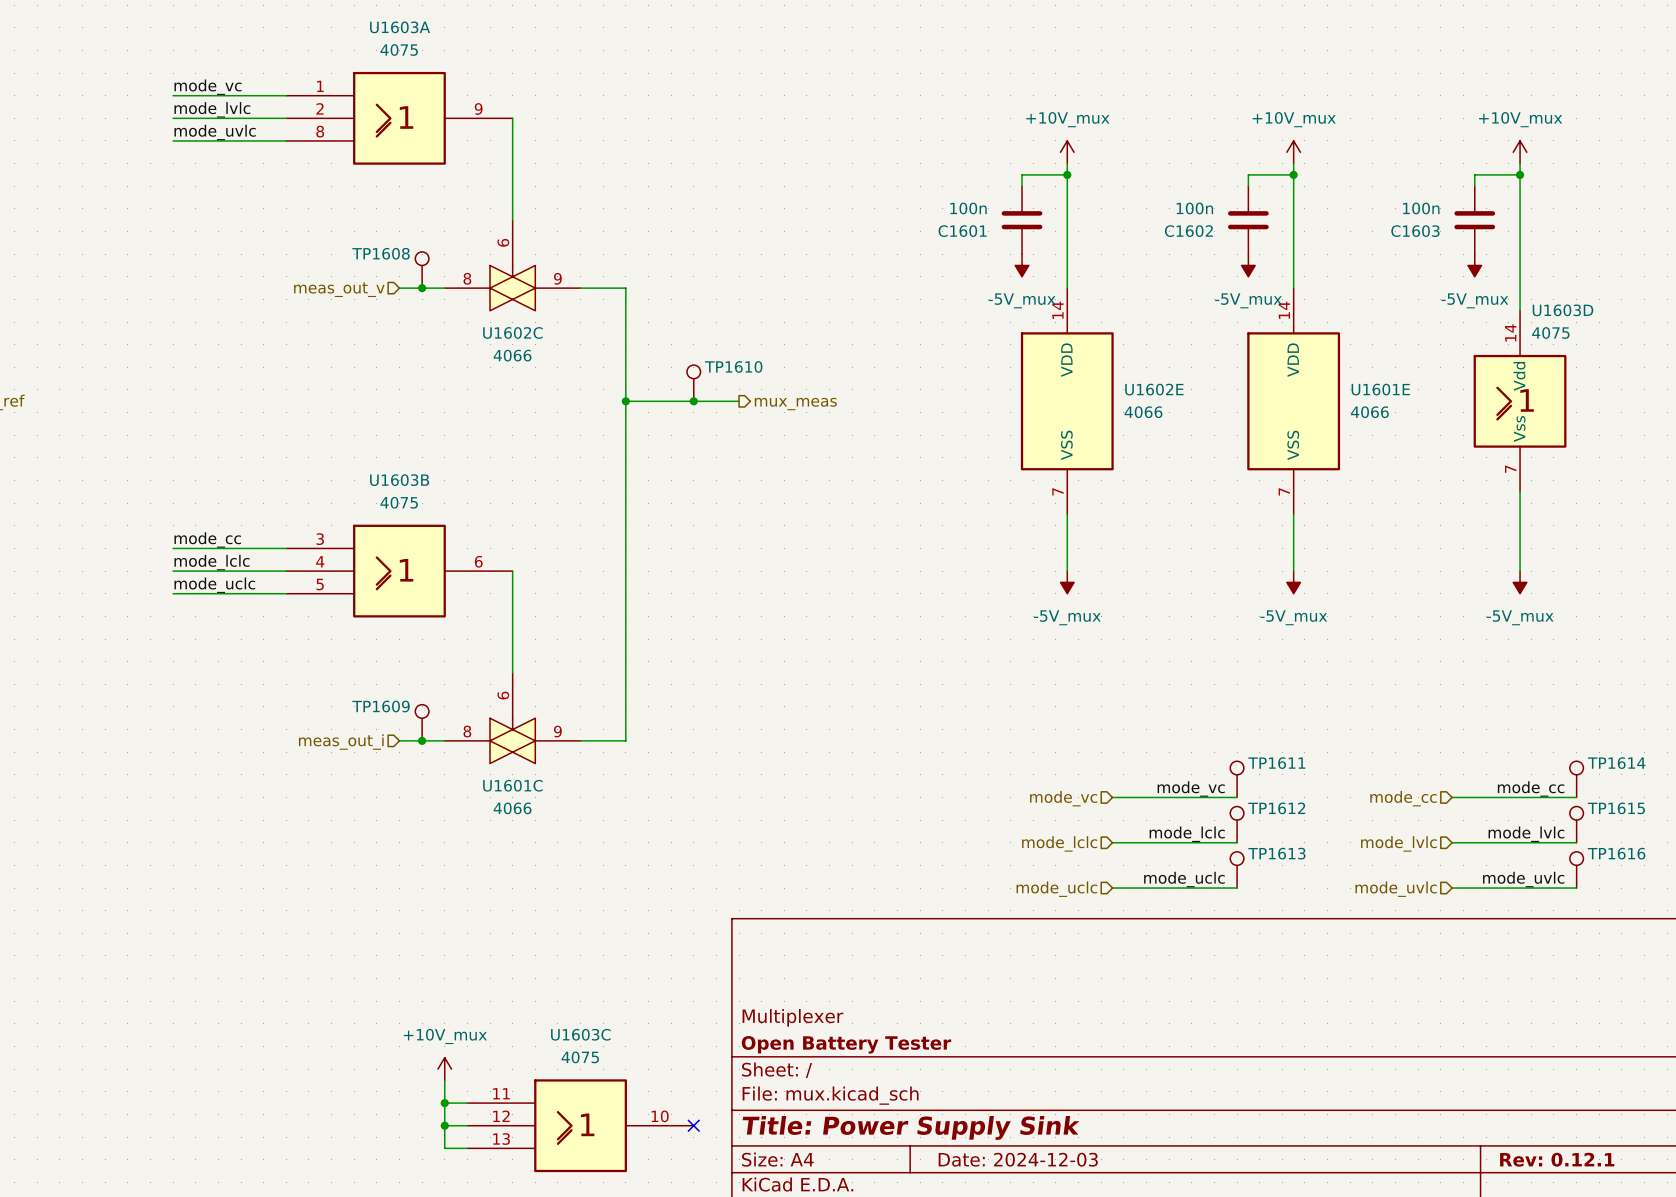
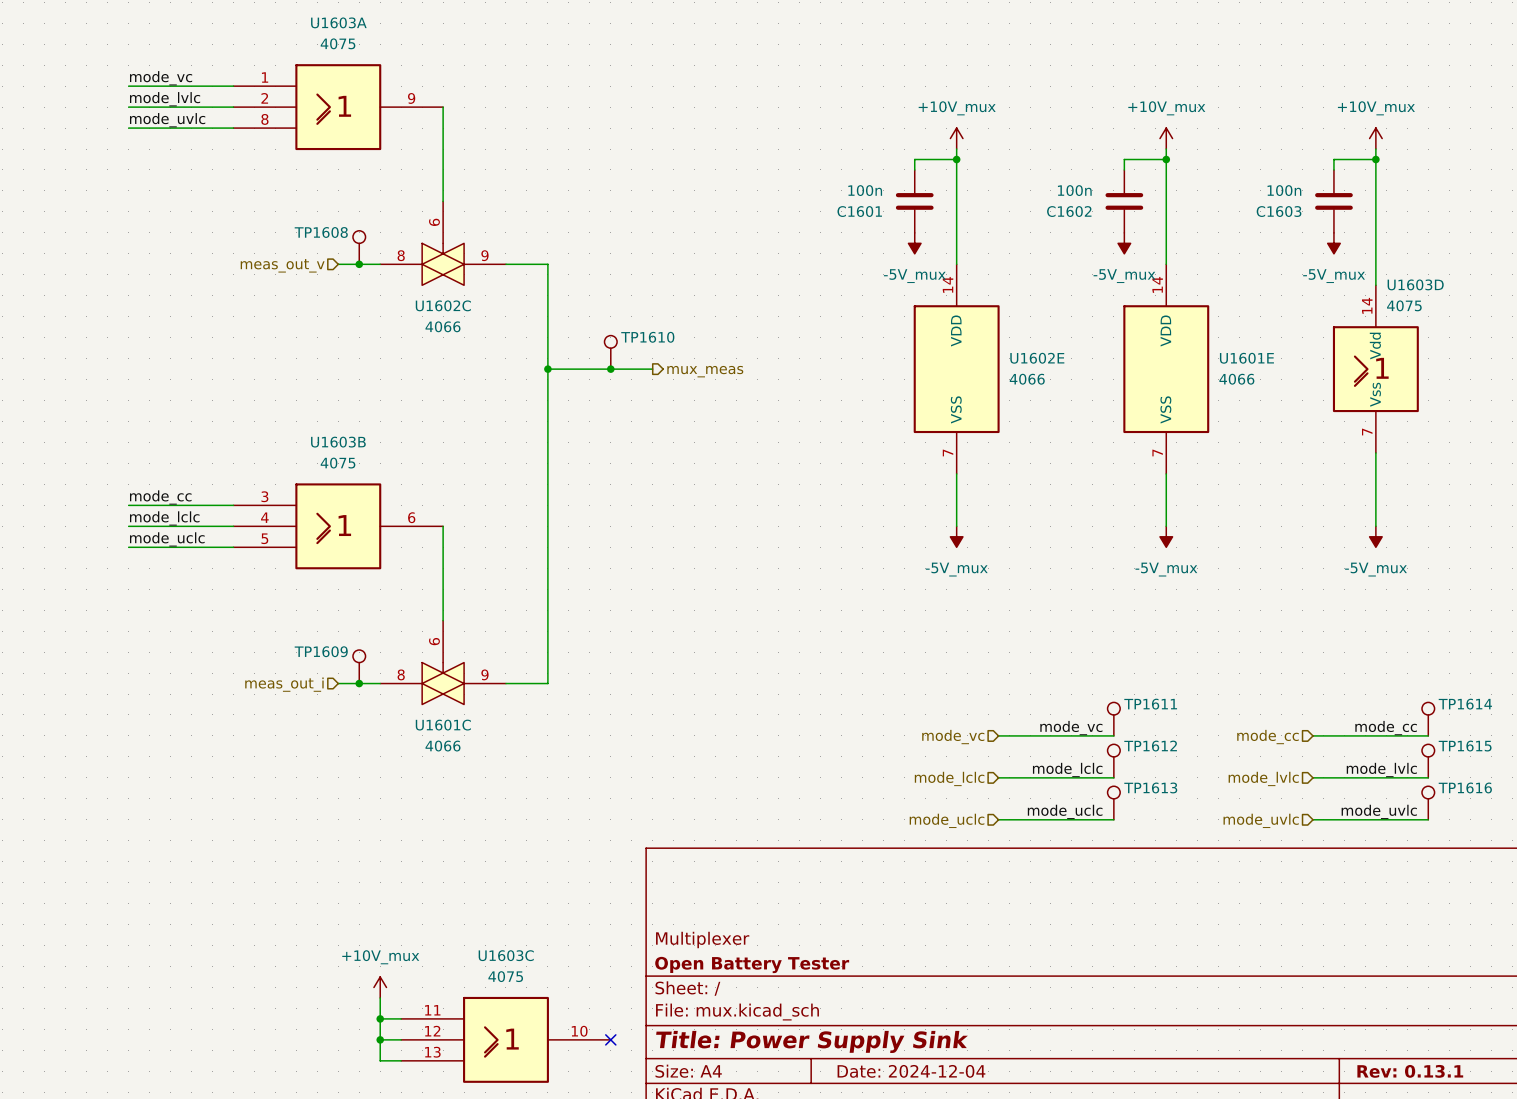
title block: Date: 2024-12-03 (1018, 1159) -> Date: 2024-12-04 (911, 1071)
title block: Rev: 0.12.1 (1557, 1159) -> Rev: 0.13.1 (1410, 1071)

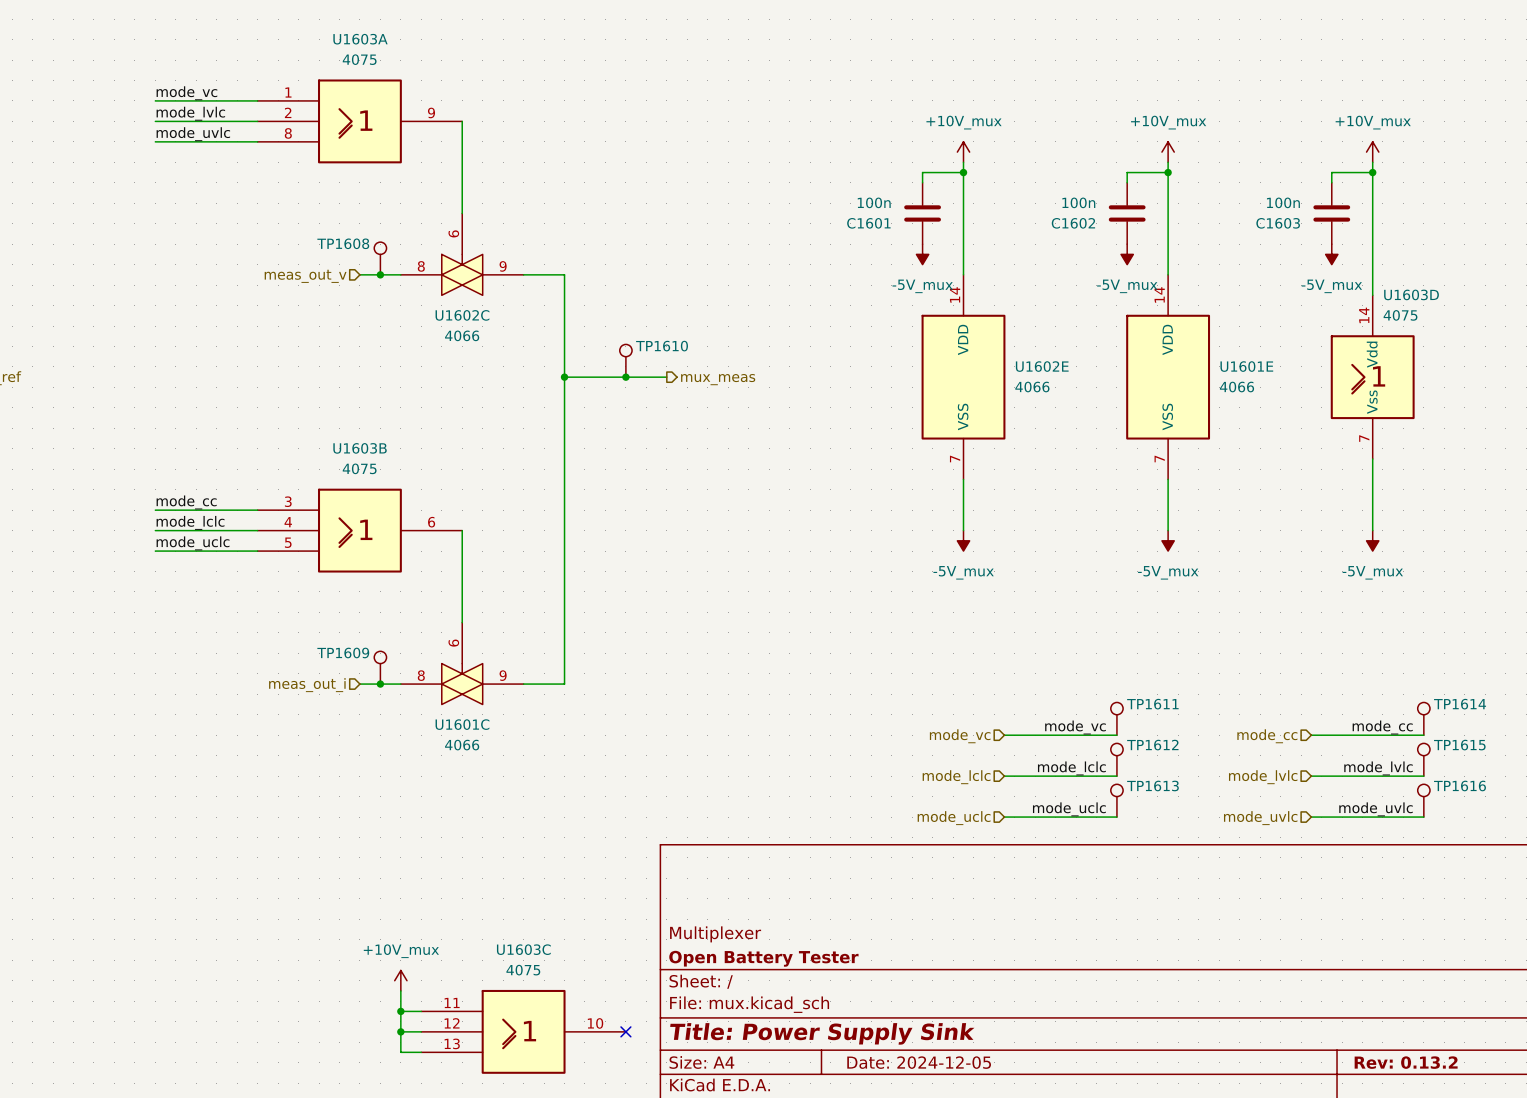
title block: Date: 2024-12-04 (911, 1071) -> Date: 2024-12-05 (919, 1062)
title block: Rev: 0.13.1 (1410, 1071) -> Rev: 0.13.2 (1406, 1062)

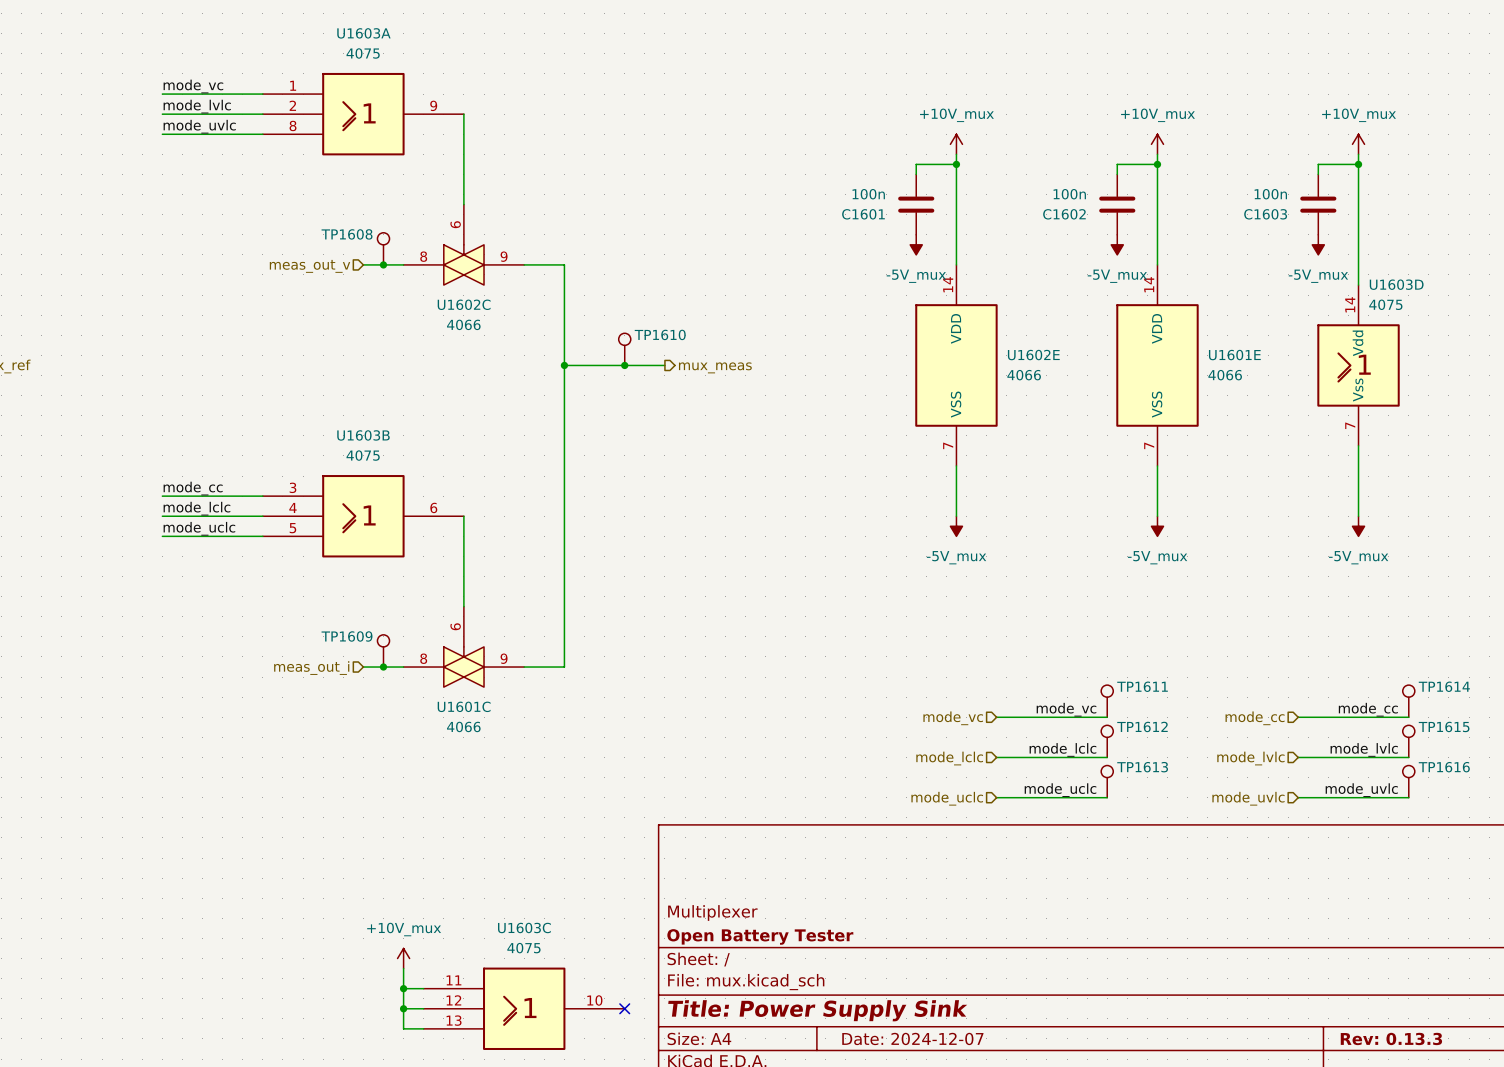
title block: Date: 2024-12-05 (919, 1062) -> Date: 2024-12-07 (912, 1038)
title block: Rev: 0.13.2 (1406, 1062) -> Rev: 0.13.3 (1391, 1038)

